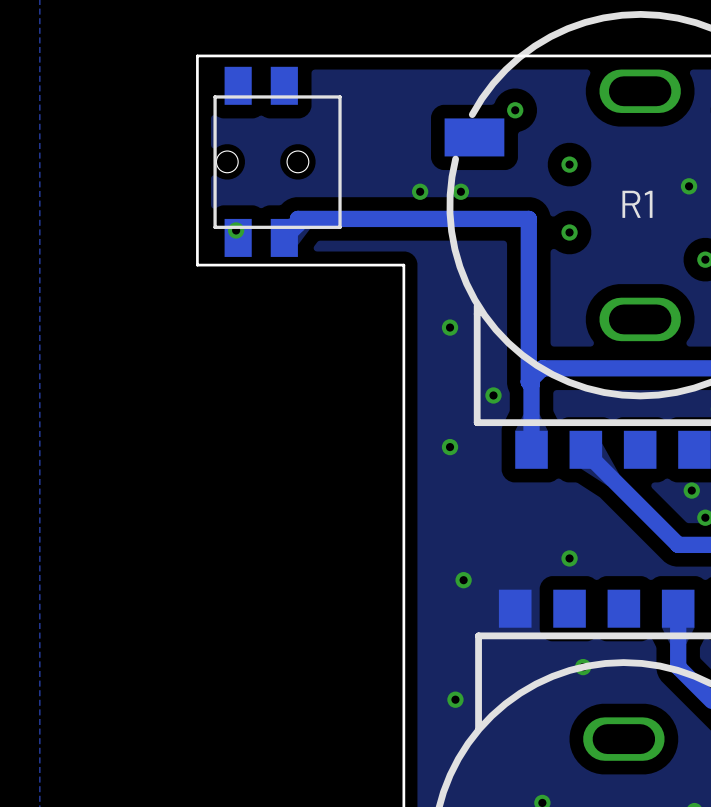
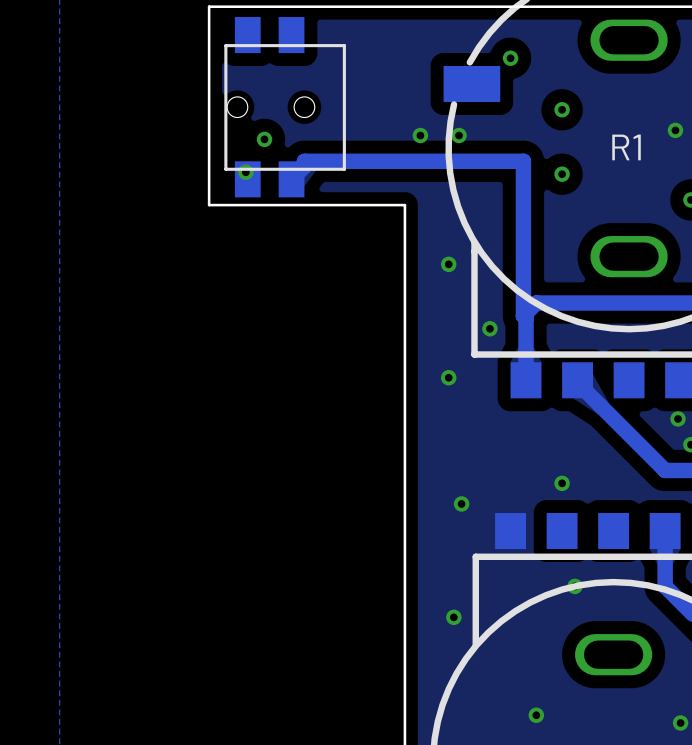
via: none -> (264, 139)

